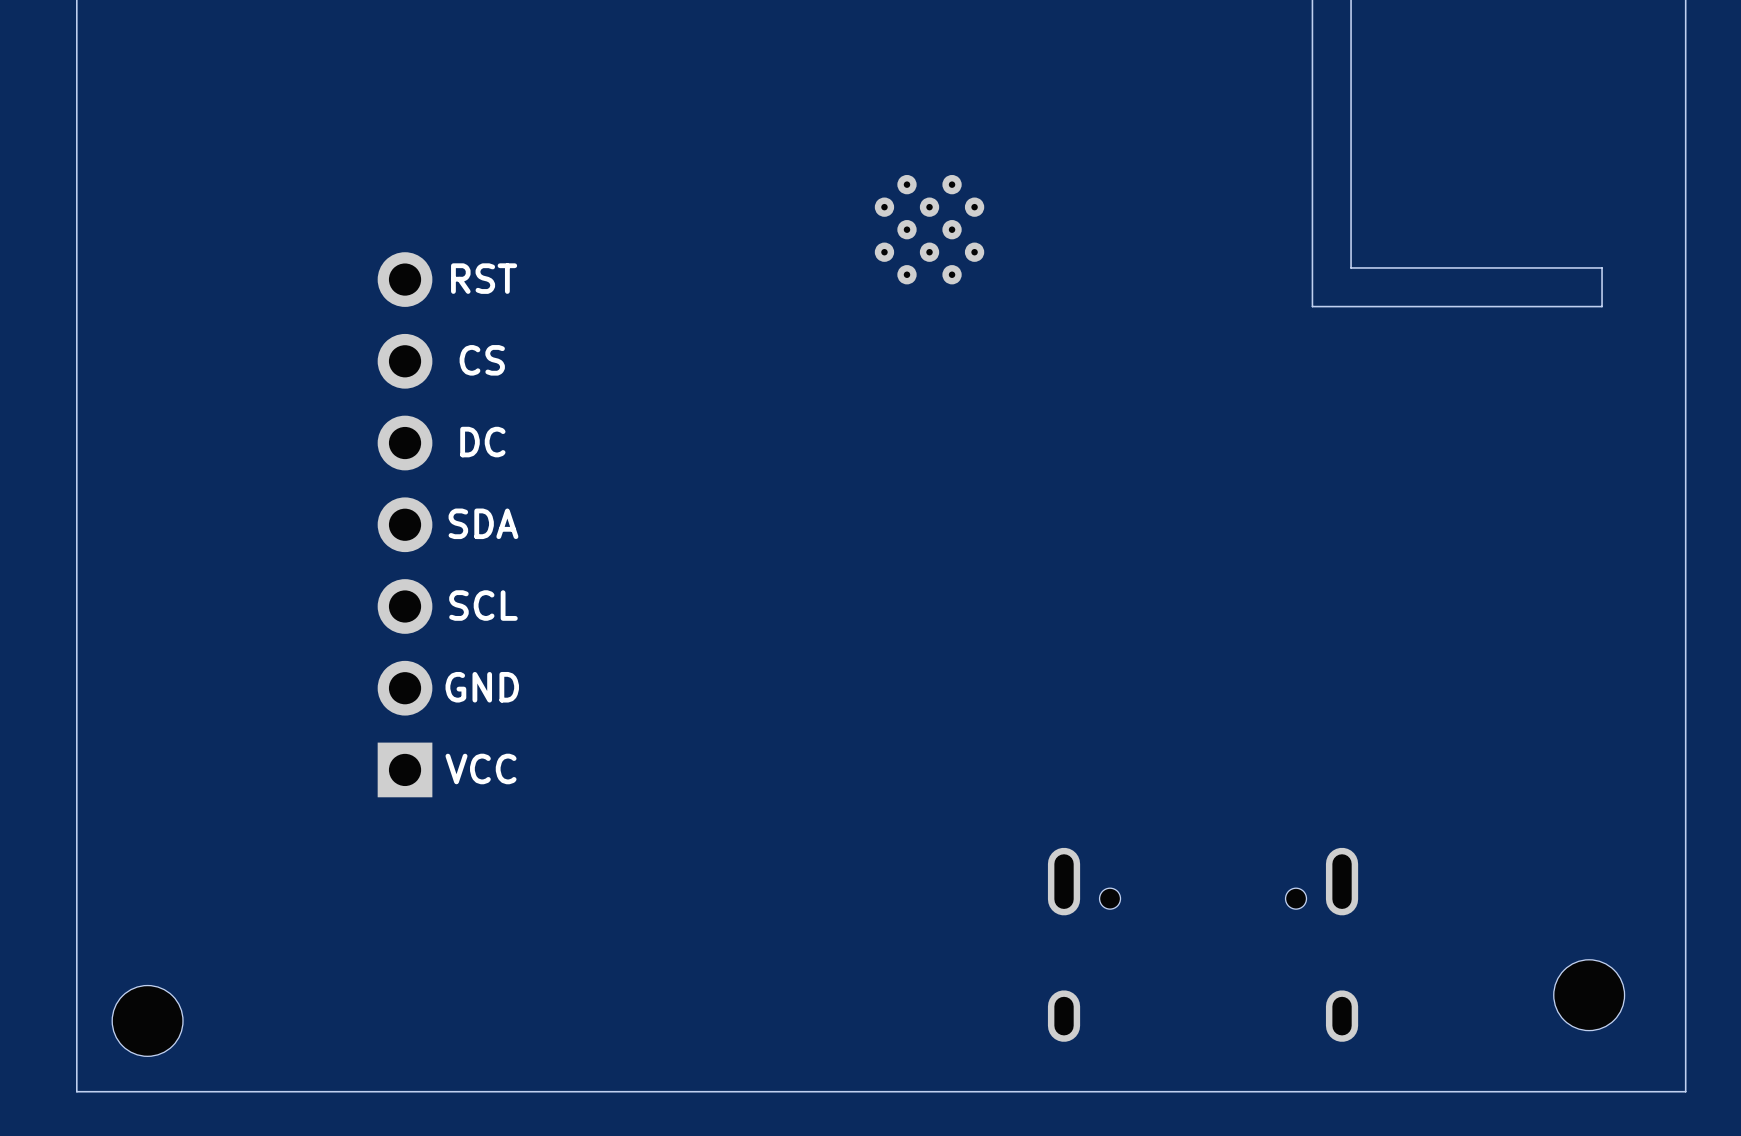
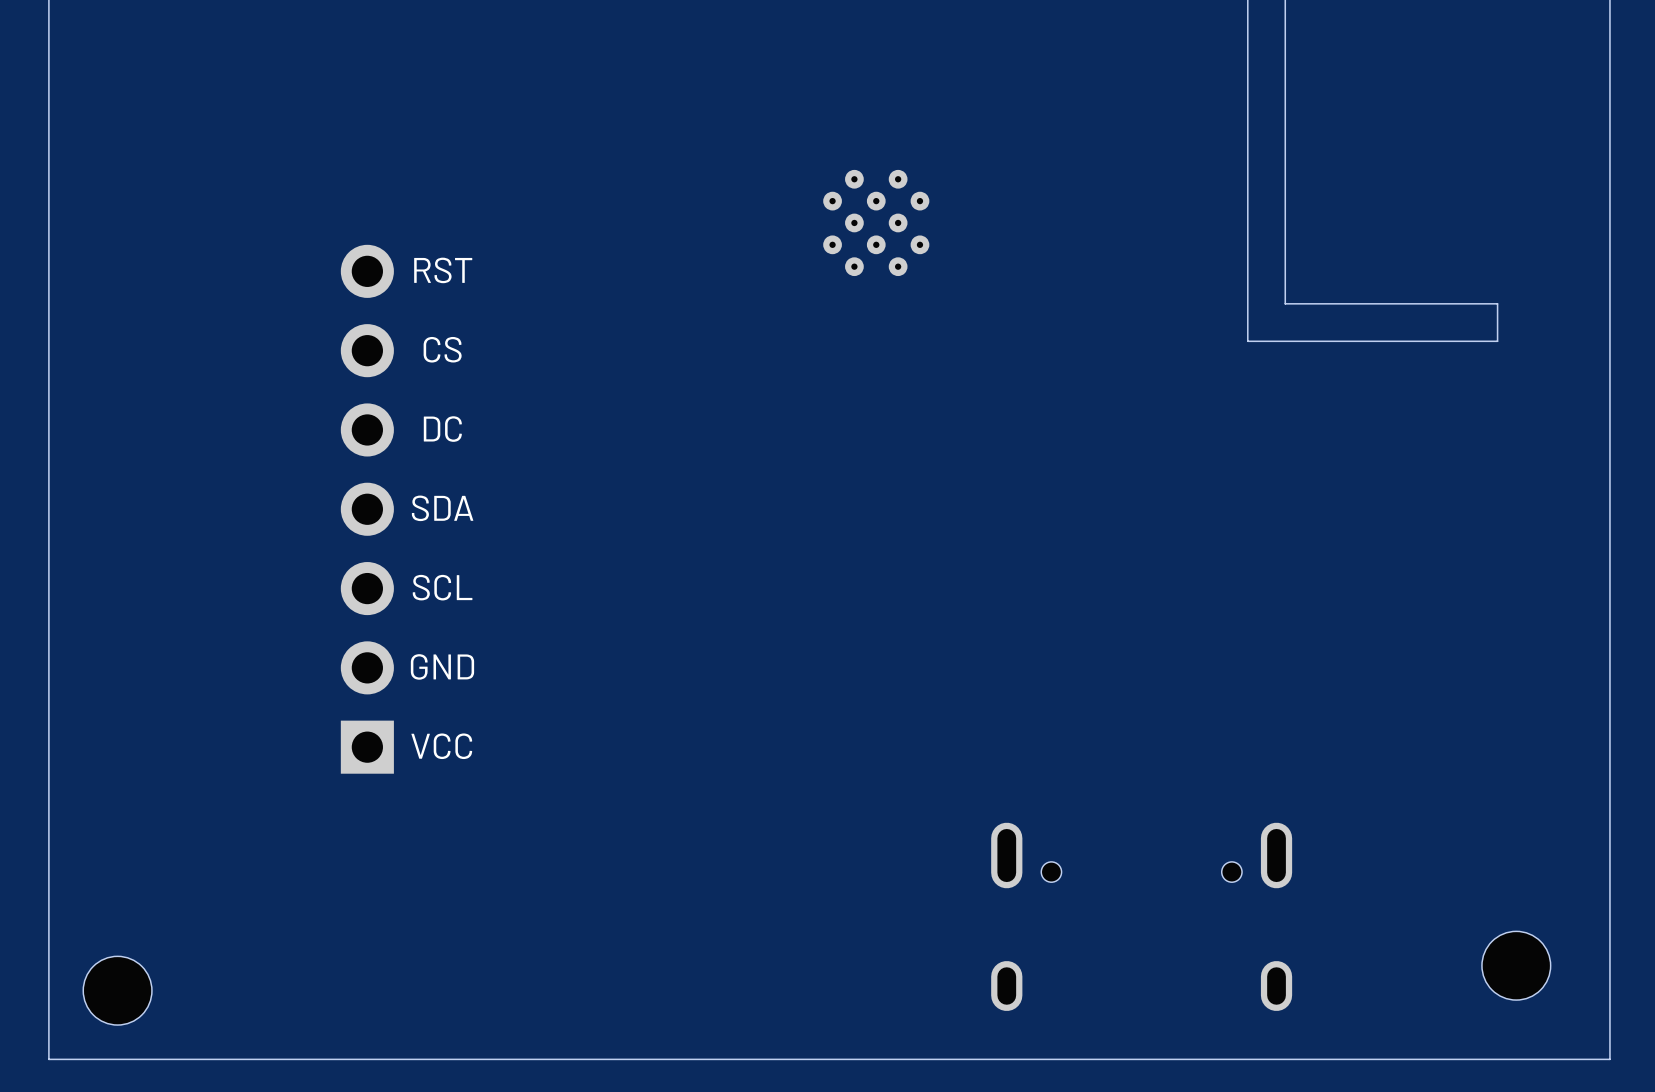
board edge: (1351, 267) (1602, 267) (1602, 306) (1312, 306) -> (1285, 260) (1285, 303) (1497, 303) (1497, 341) (1247, 341) (1247, 297)

